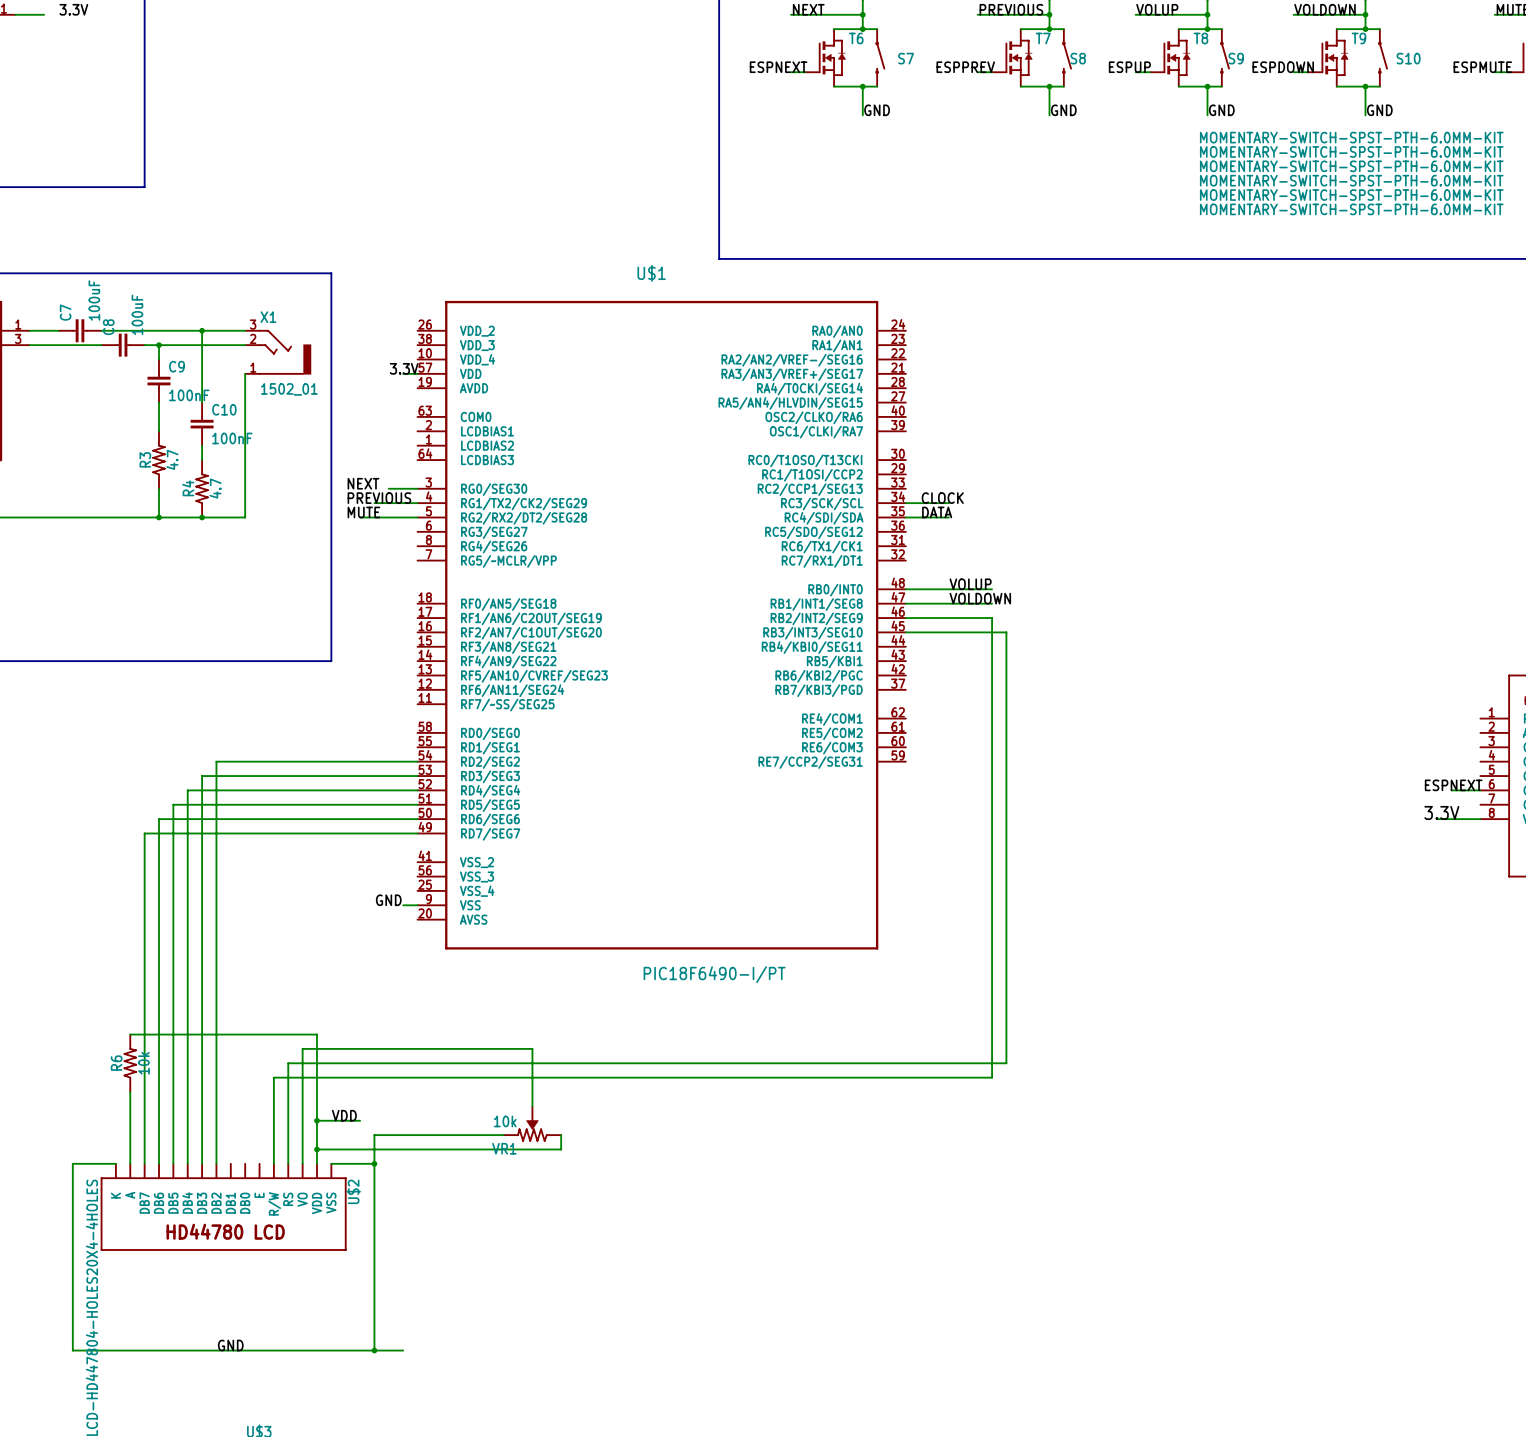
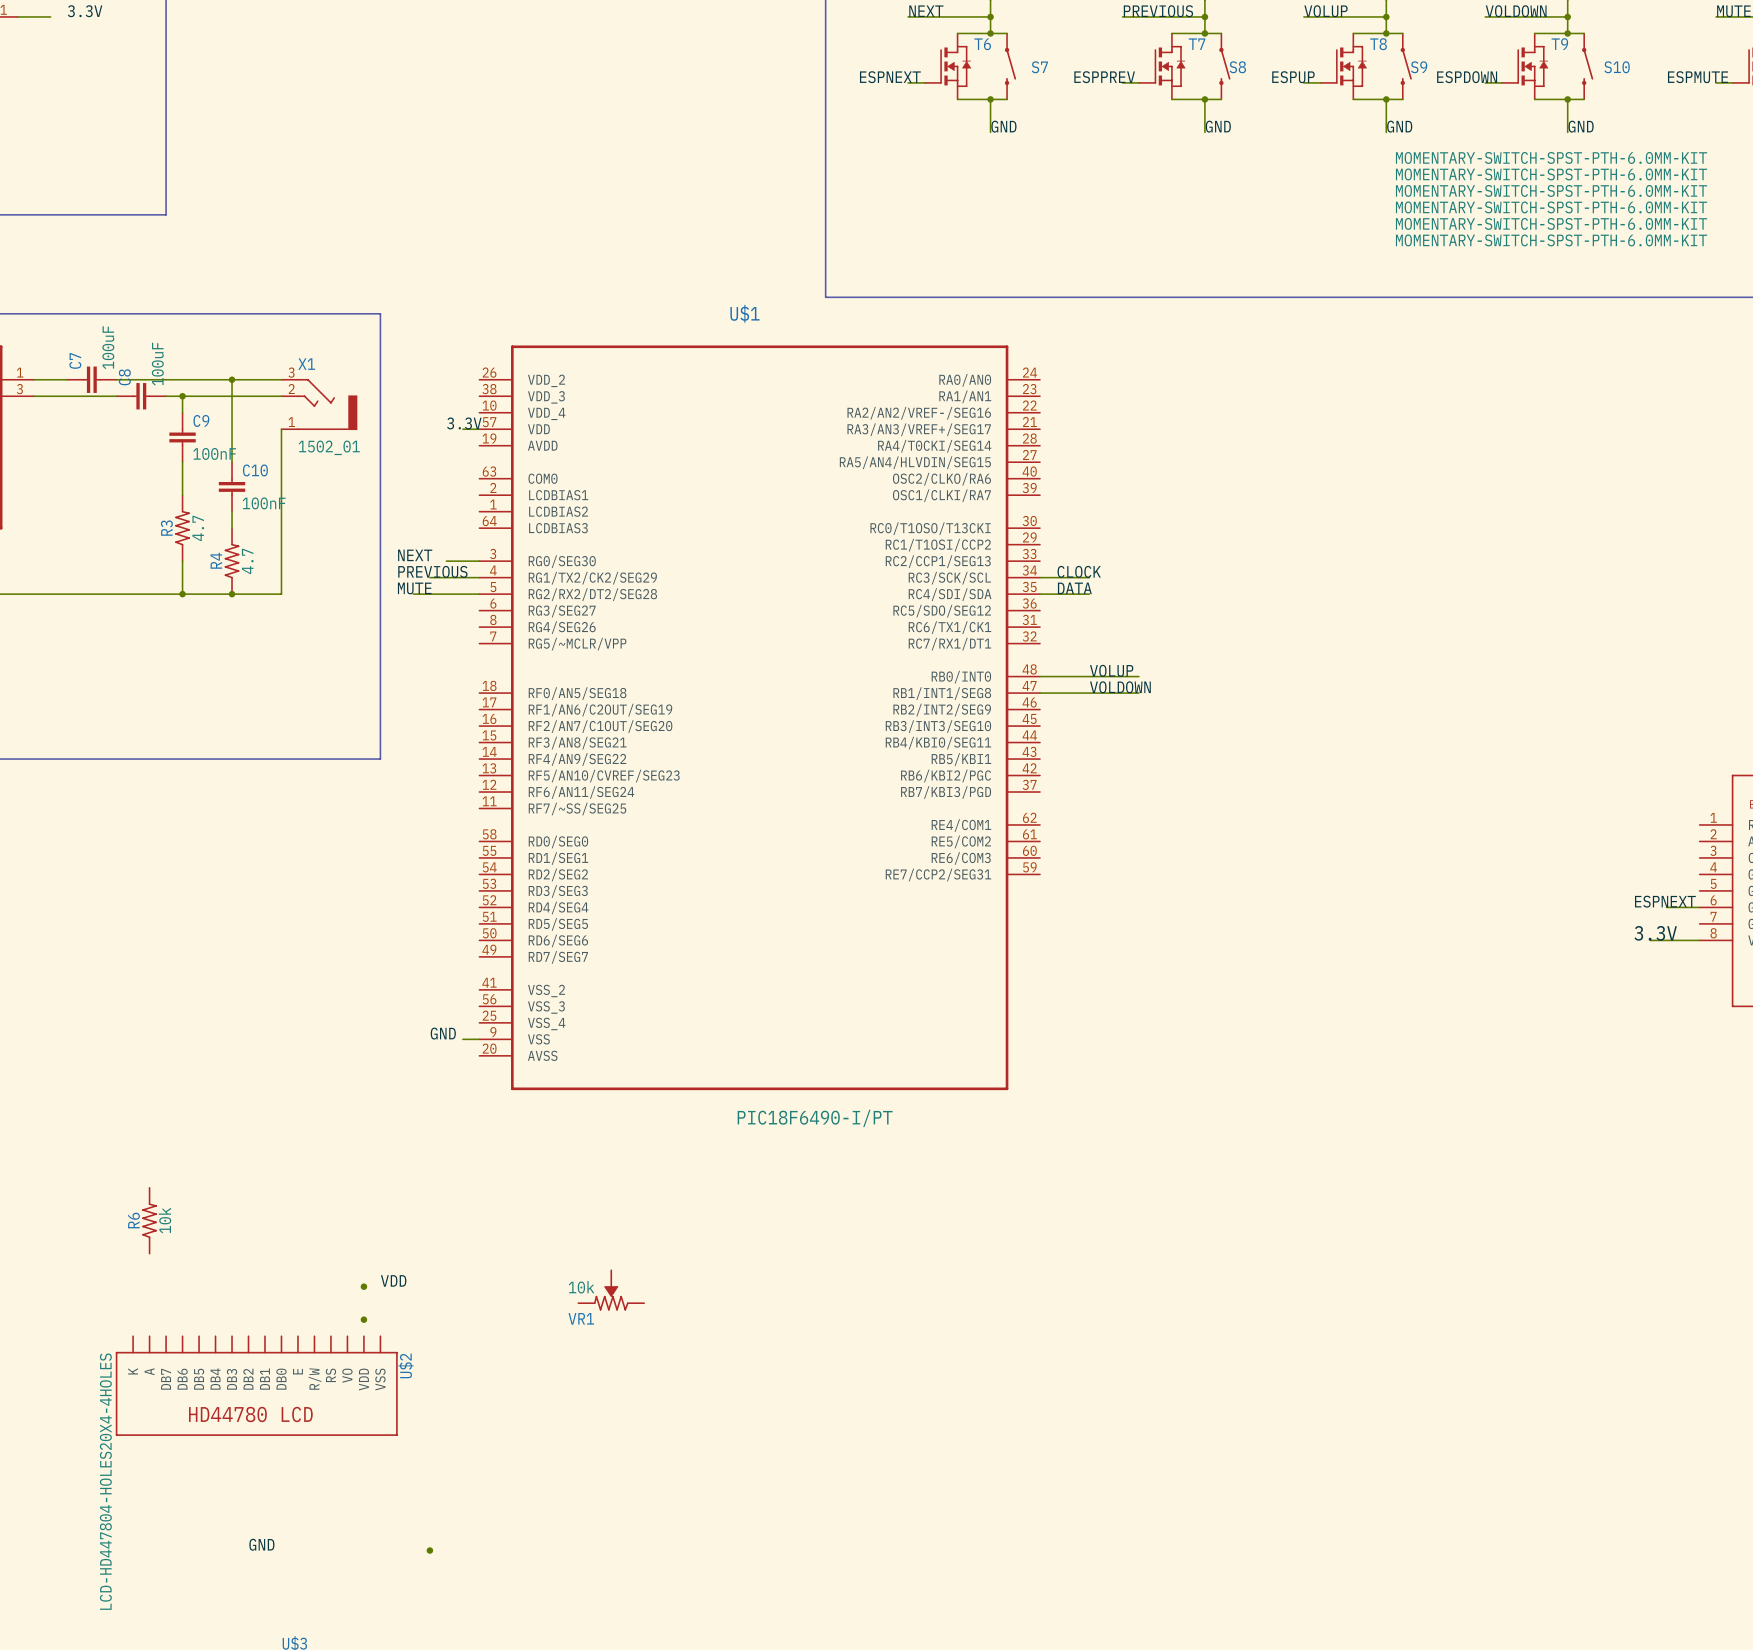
wire: (905, 618) (992, 618) (992, 1077) (273, 1077) (273, 1163) -> none
wire: (905, 632) (1006, 632) (1006, 1063) (288, 1063) (288, 1163) -> none
wire: (417, 761) (216, 761) (216, 1163) -> none
wire: (417, 776) (202, 776) (202, 1163) -> none
wire: (417, 790) (187, 790) (187, 1163) -> none
wire: (417, 804) (173, 804) (173, 1163) -> none
wire: (417, 819) (159, 819) (159, 1163) -> none
wire: (417, 833) (144, 833) (144, 1163) -> none
wire: (130, 1034) (316, 1034) (316, 1163) -> none
wire: (130, 1092) (130, 1163) -> none
wire: (532, 1106) (532, 1048) (302, 1048) (302, 1163) -> none
wire: (316, 1120) (360, 1120) -> none
wire: (503, 1135) (374, 1135) (374, 1350) -> none
wire: (561, 1135) (561, 1149) (316, 1149) -> none
wire: (115, 1163) (72, 1163) (72, 1350) (403, 1350) -> none
wire: (331, 1163) (374, 1163) -> none
junction: (374, 1163) -> none

